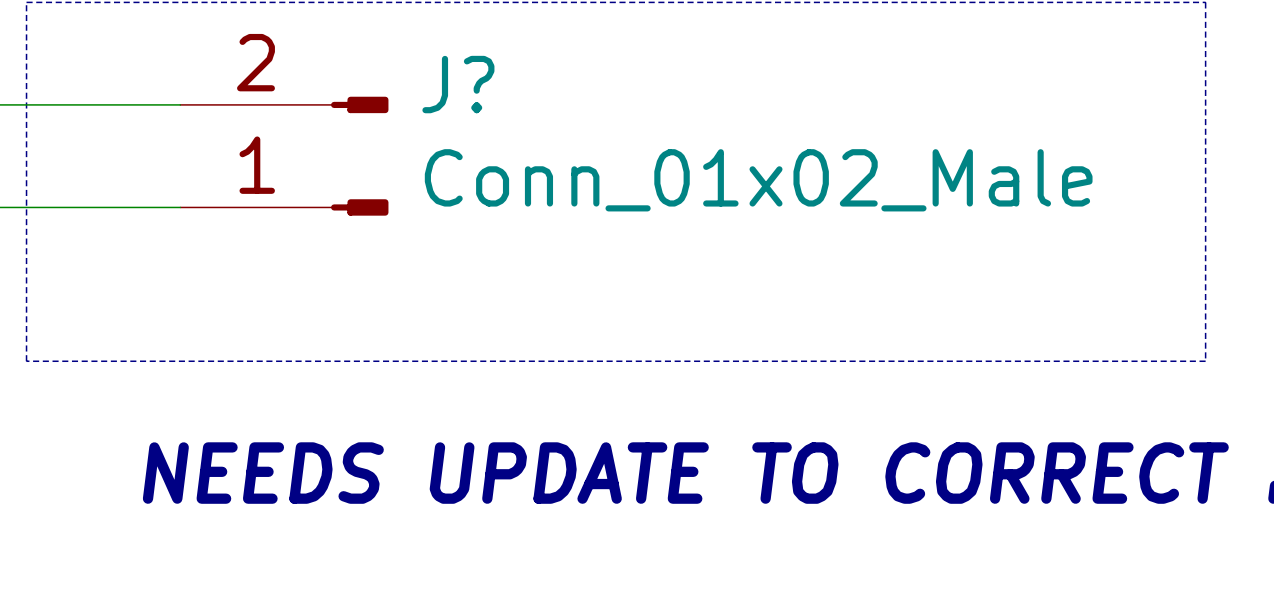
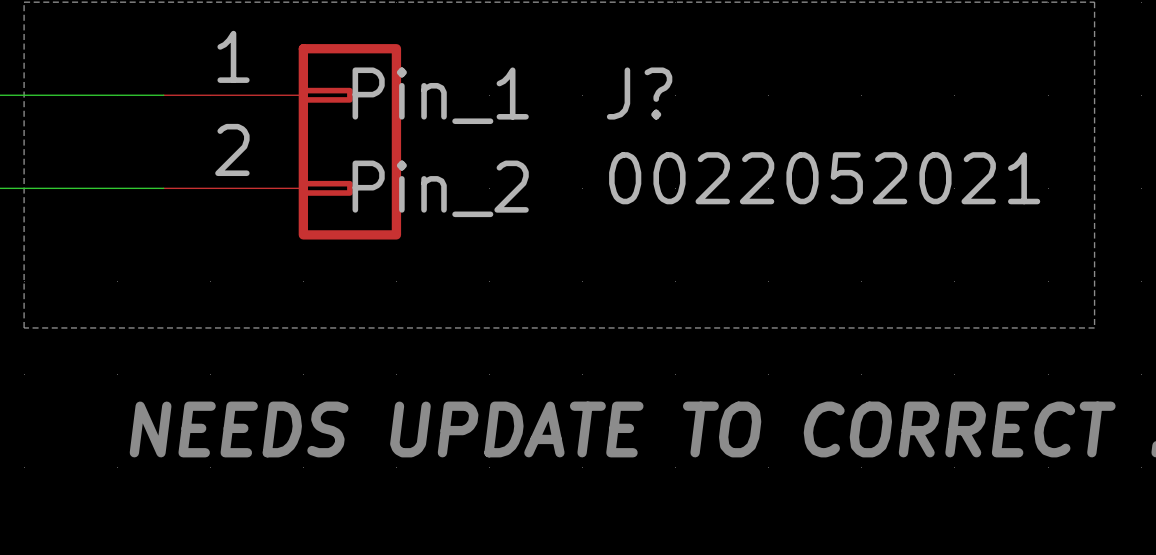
J? name position: J? (458, 84) -> J? (639, 93)
J? symbol: [180, 96, 389, 216] -> [163, 44, 402, 240]
J? value: Conn_01x02_Male (758, 180) -> 0022052021 (824, 178)

